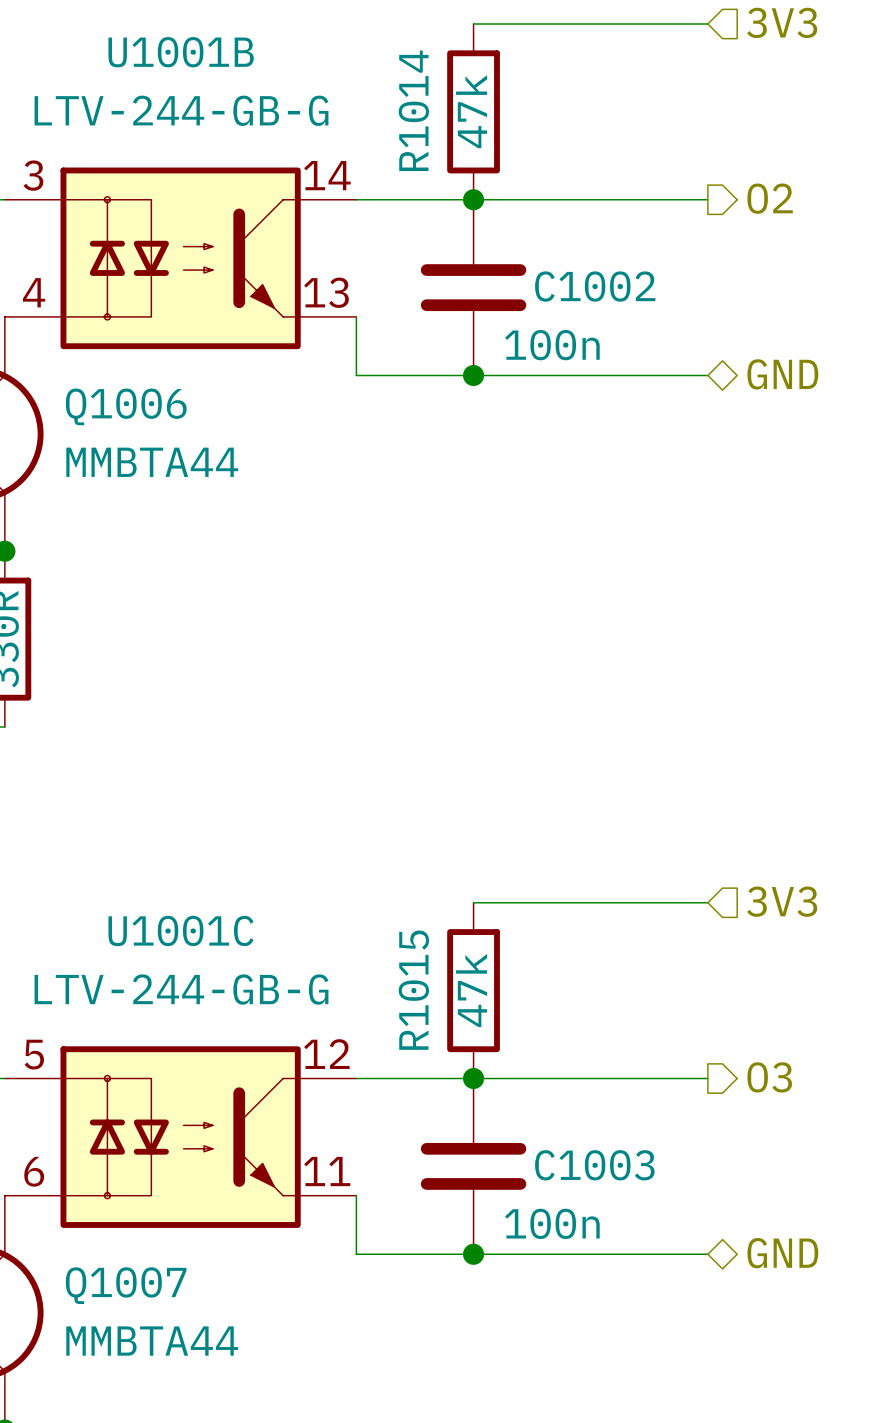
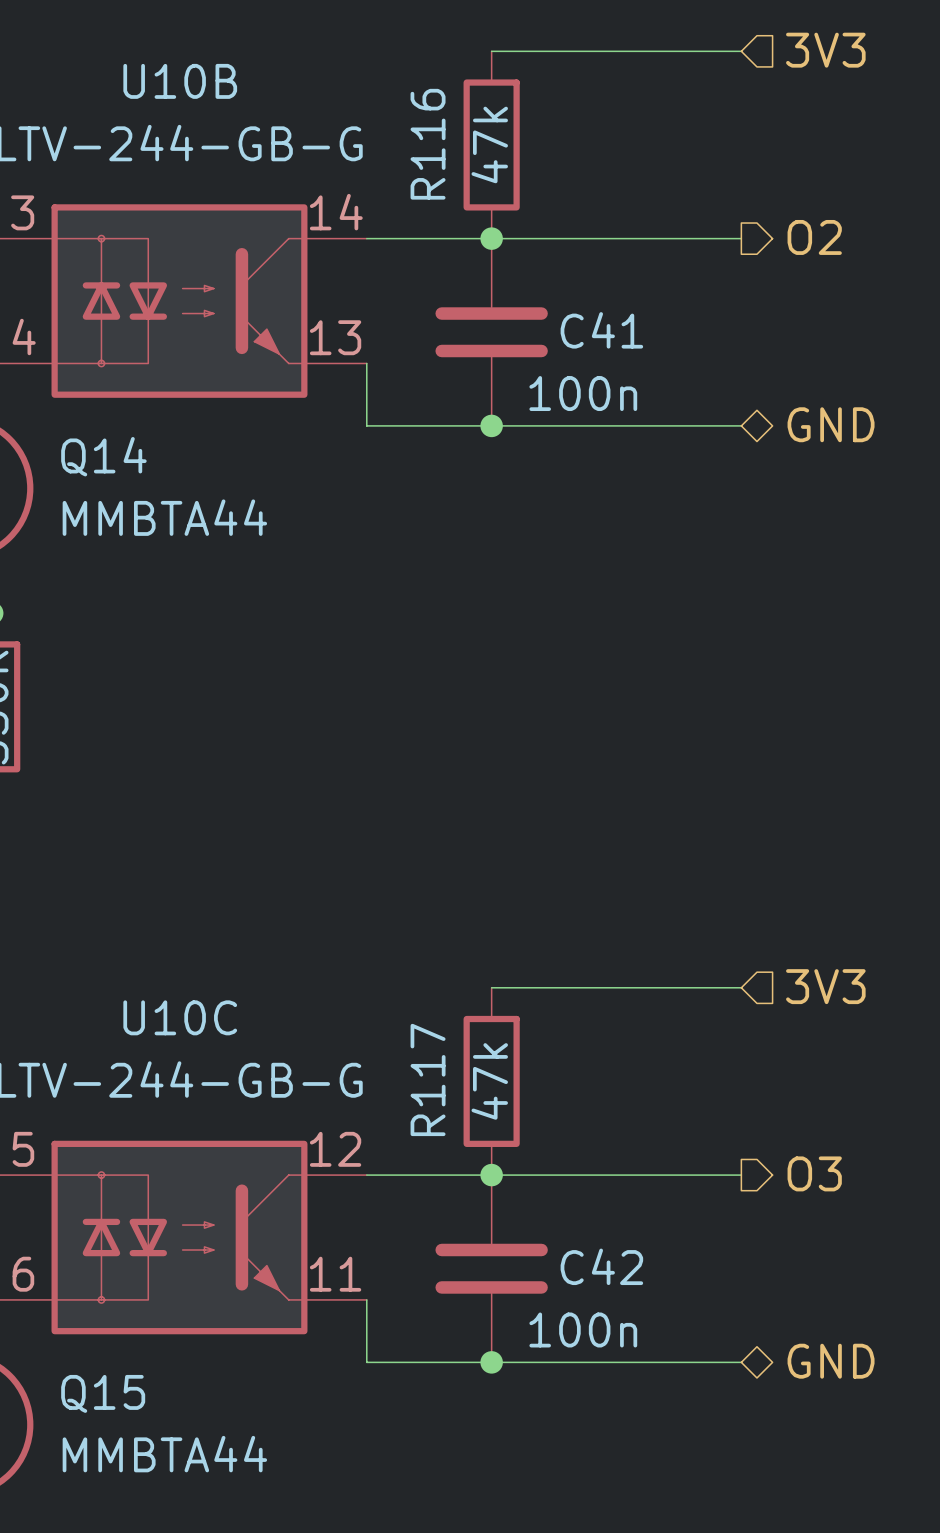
U1001B name: U1001B (181, 52) -> U10B (180, 81)
R1014 name: R1014 (413, 110) -> R116 (428, 144)
C1002 name: C1002 (595, 286) -> C41 (601, 330)
Q1006 name: Q1006 (126, 406) -> Q14 (103, 456)
U1001C name: U1001C (181, 930) -> U10C (180, 1017)
R1015 name: R1015 (413, 990) -> R117 (428, 1079)
C1003 name: C1003 (594, 1165) -> C42 (601, 1266)
Q1007 name: Q1007 (126, 1285) -> Q15 (103, 1393)

